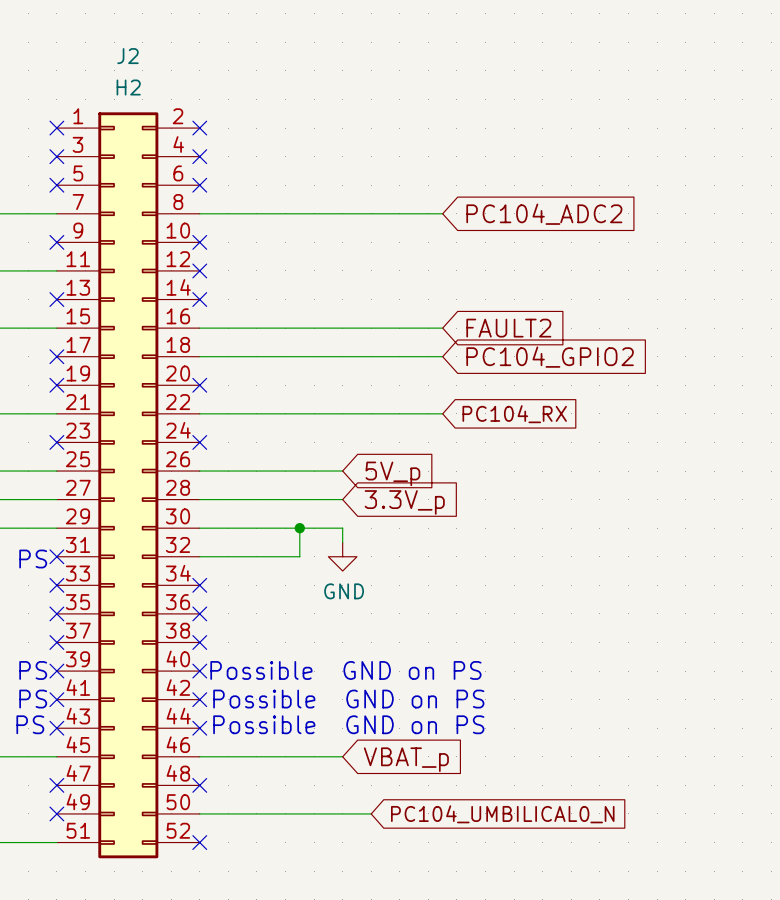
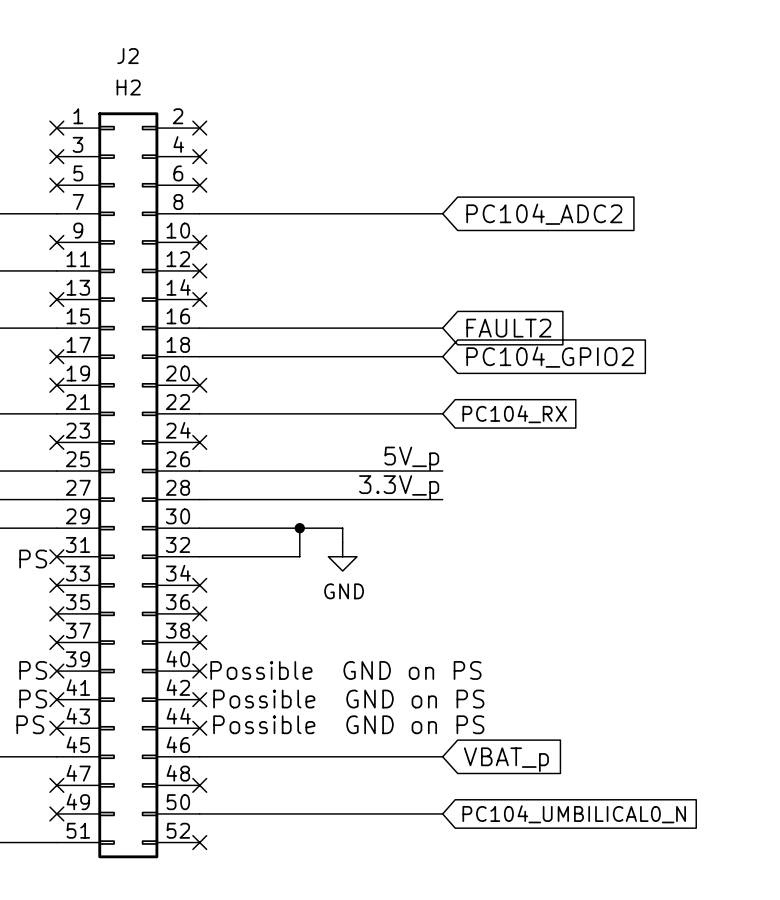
label: none -> 5V_p (411, 458)
wire: none -> (342, 471) (442, 471)
global label: 5V_p (392, 473) -> none
label: none -> 3.3V_p (399, 487)
wire: none -> (342, 499) (442, 499)
global label: 3.3V_p (404, 502) -> none
wire: none -> (342, 756) (442, 756)
global label position: VBAT_p (406, 759) -> VBAT_p (506, 759)
wire: none -> (371, 813) (442, 813)
global label position: PC104_UMBILICAL0_N (502, 814) -> PC104_UMBILICAL0_N (574, 814)

